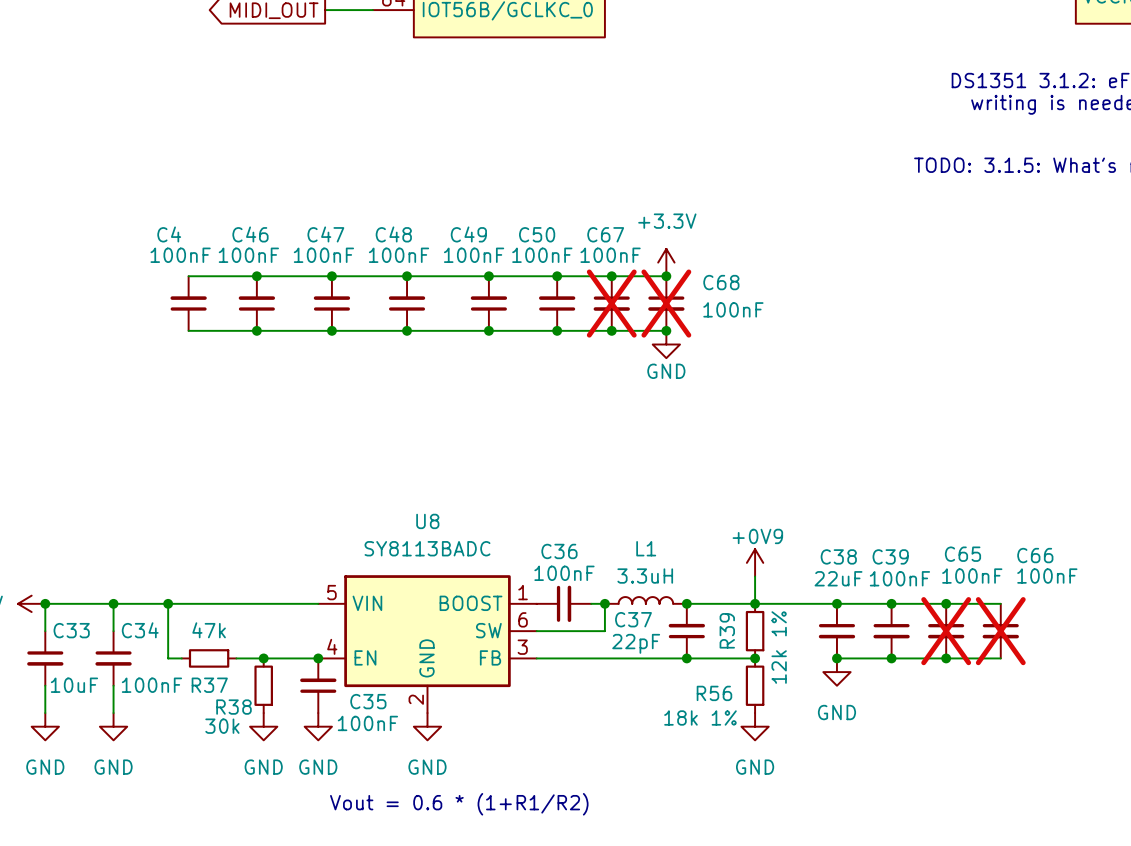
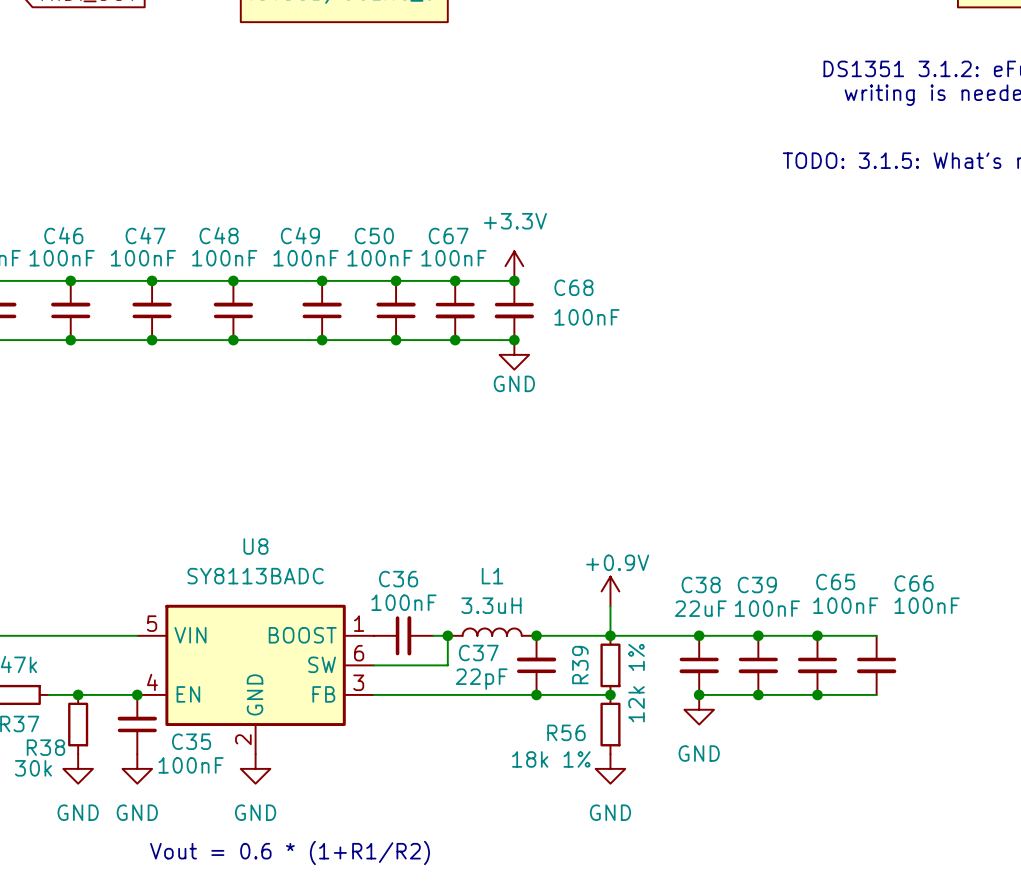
C67 do-not-place cross: (611, 303) -> none
C68 do-not-place cross: (666, 303) -> none
power symbol: +0V9 (755, 562) -> +0.9V (610, 591)
C65 do-not-place cross: (946, 631) -> none
C66 do-not-place cross: (1000, 631) -> none

